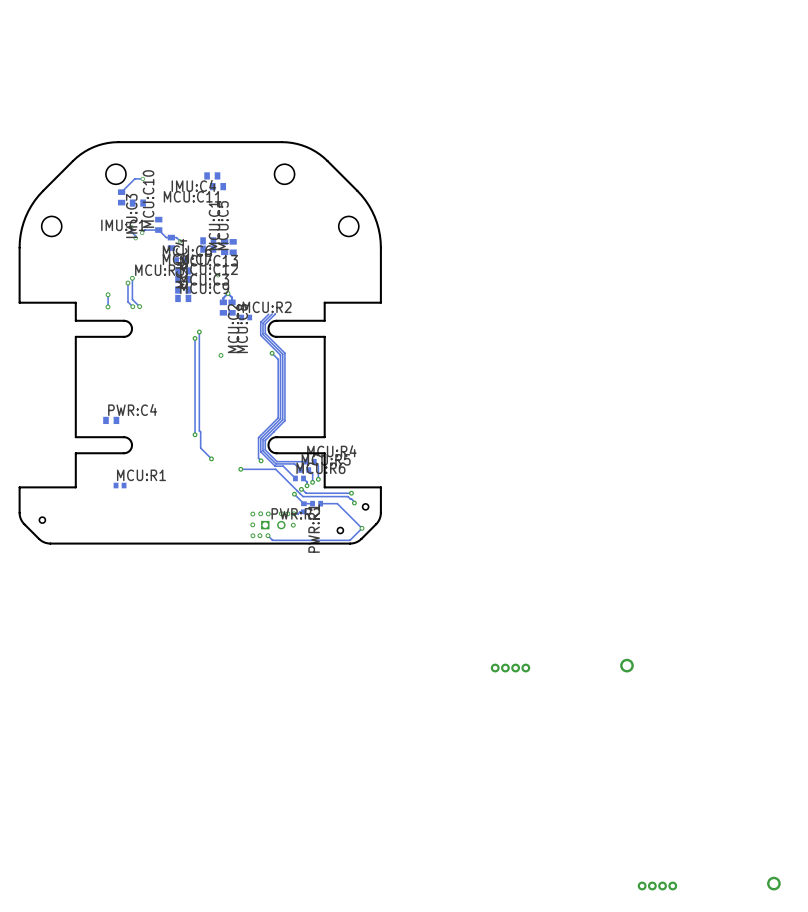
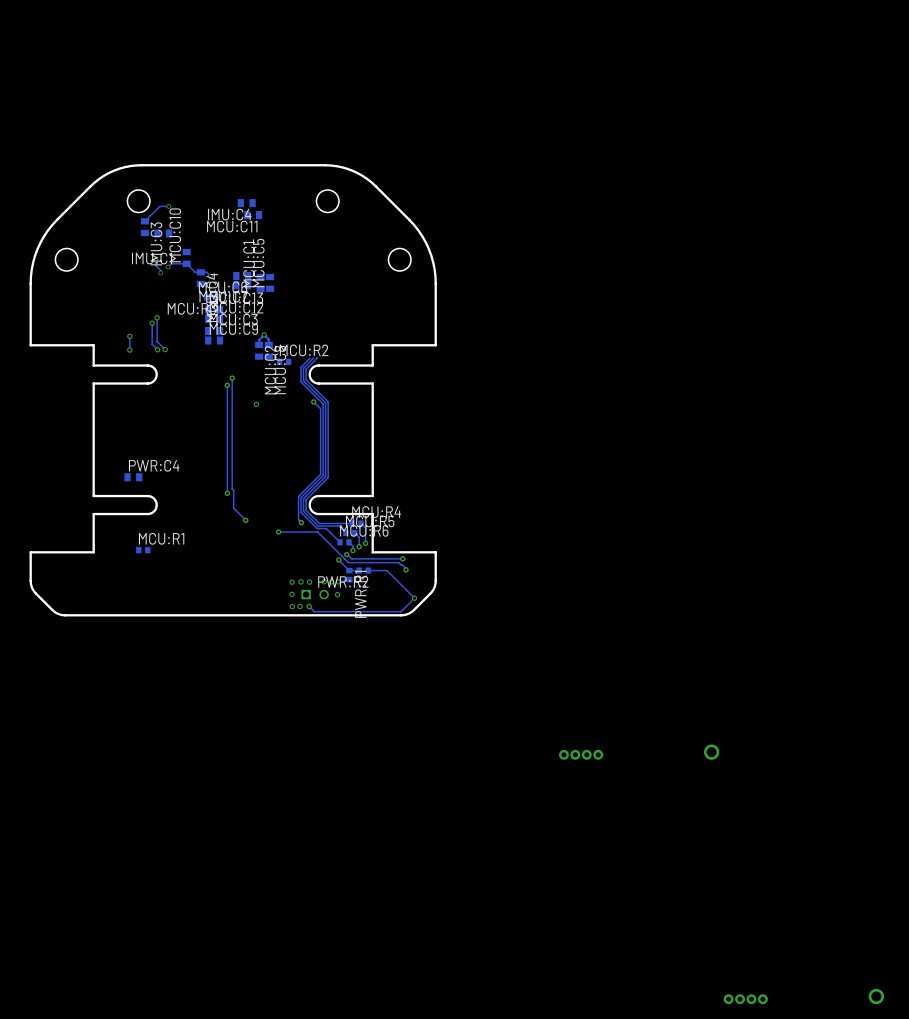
part: (365, 506) -> none
part: (42, 520) -> none
part: (340, 530) -> none

